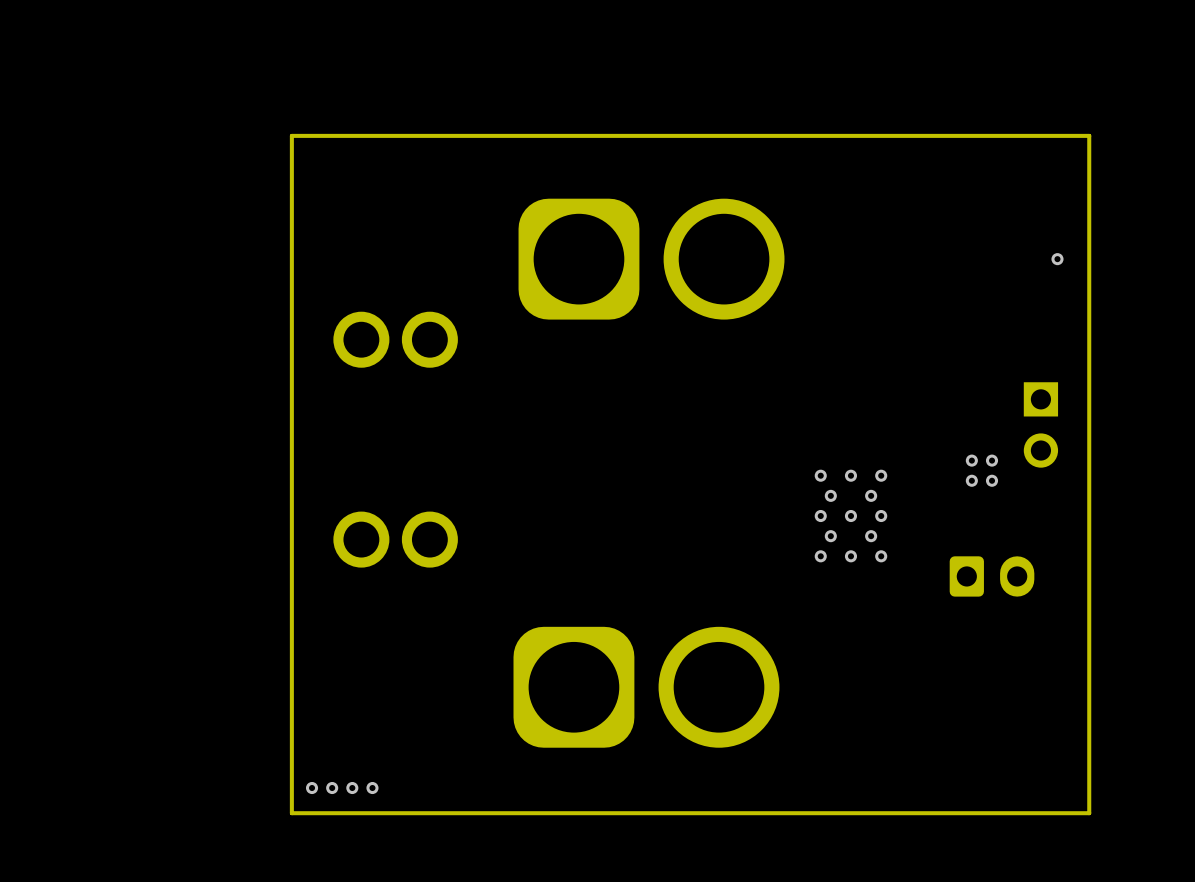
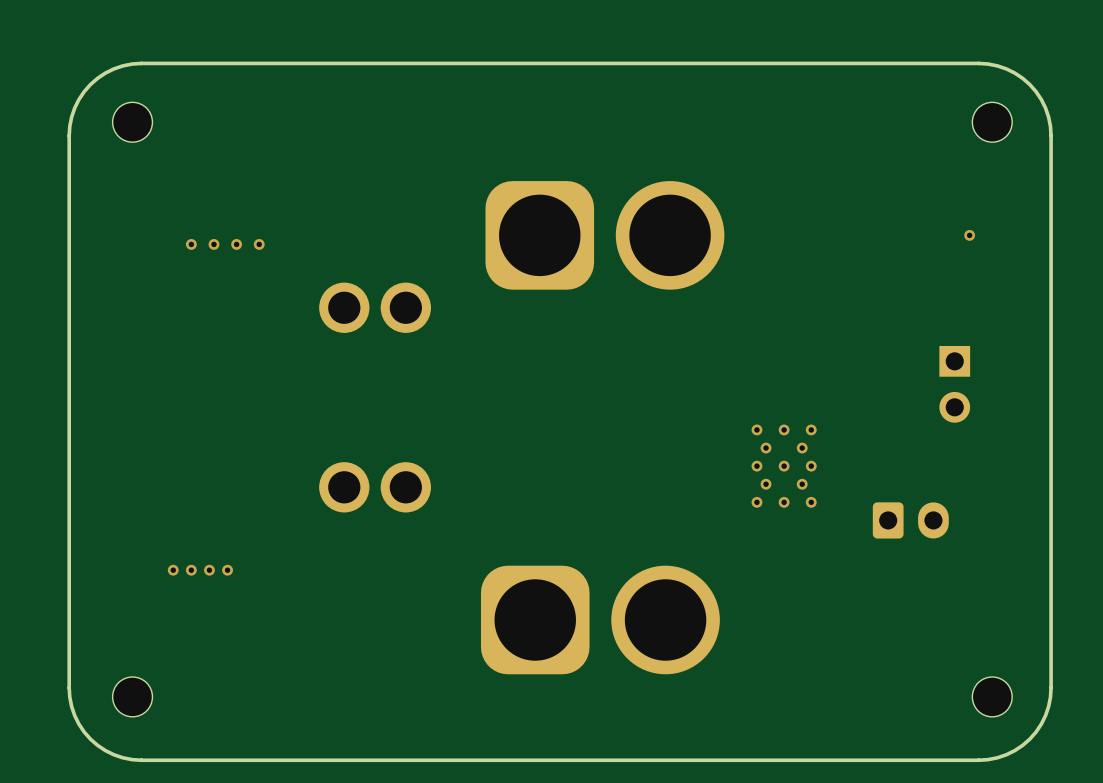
part: none -> (132, 122)
part: none -> (992, 122)
board edge: (1089, 135) (291, 135) (291, 813) (1089, 813) (1089, 135) -> (978, 63) (1006, 68) (1029, 84) (1045, 108) (1051, 135) (1051, 687) (1045, 715) (1036, 731) (1022, 745) (997, 757) (978, 760) (141, 760) (122, 757) (105, 750) (84, 731) (71, 706) (69, 687) (69, 135) (71, 117) (78, 99) (97, 78) (113, 68) (141, 63) (978, 63)
via: none -> (191, 244)
via: none -> (213, 244)
via: none -> (236, 244)
via: none -> (259, 244)
via: (971, 460) -> none
via: (992, 460) -> none
via: (971, 480) -> none
via: (992, 480) -> none
via: none -> (173, 570)
via: none -> (191, 570)
via: none -> (209, 570)
via: none -> (227, 570)
part: none -> (132, 696)
part: none -> (992, 696)
via: (312, 788) -> none
via: (332, 788) -> none
via: (352, 788) -> none
via: (372, 788) -> none

